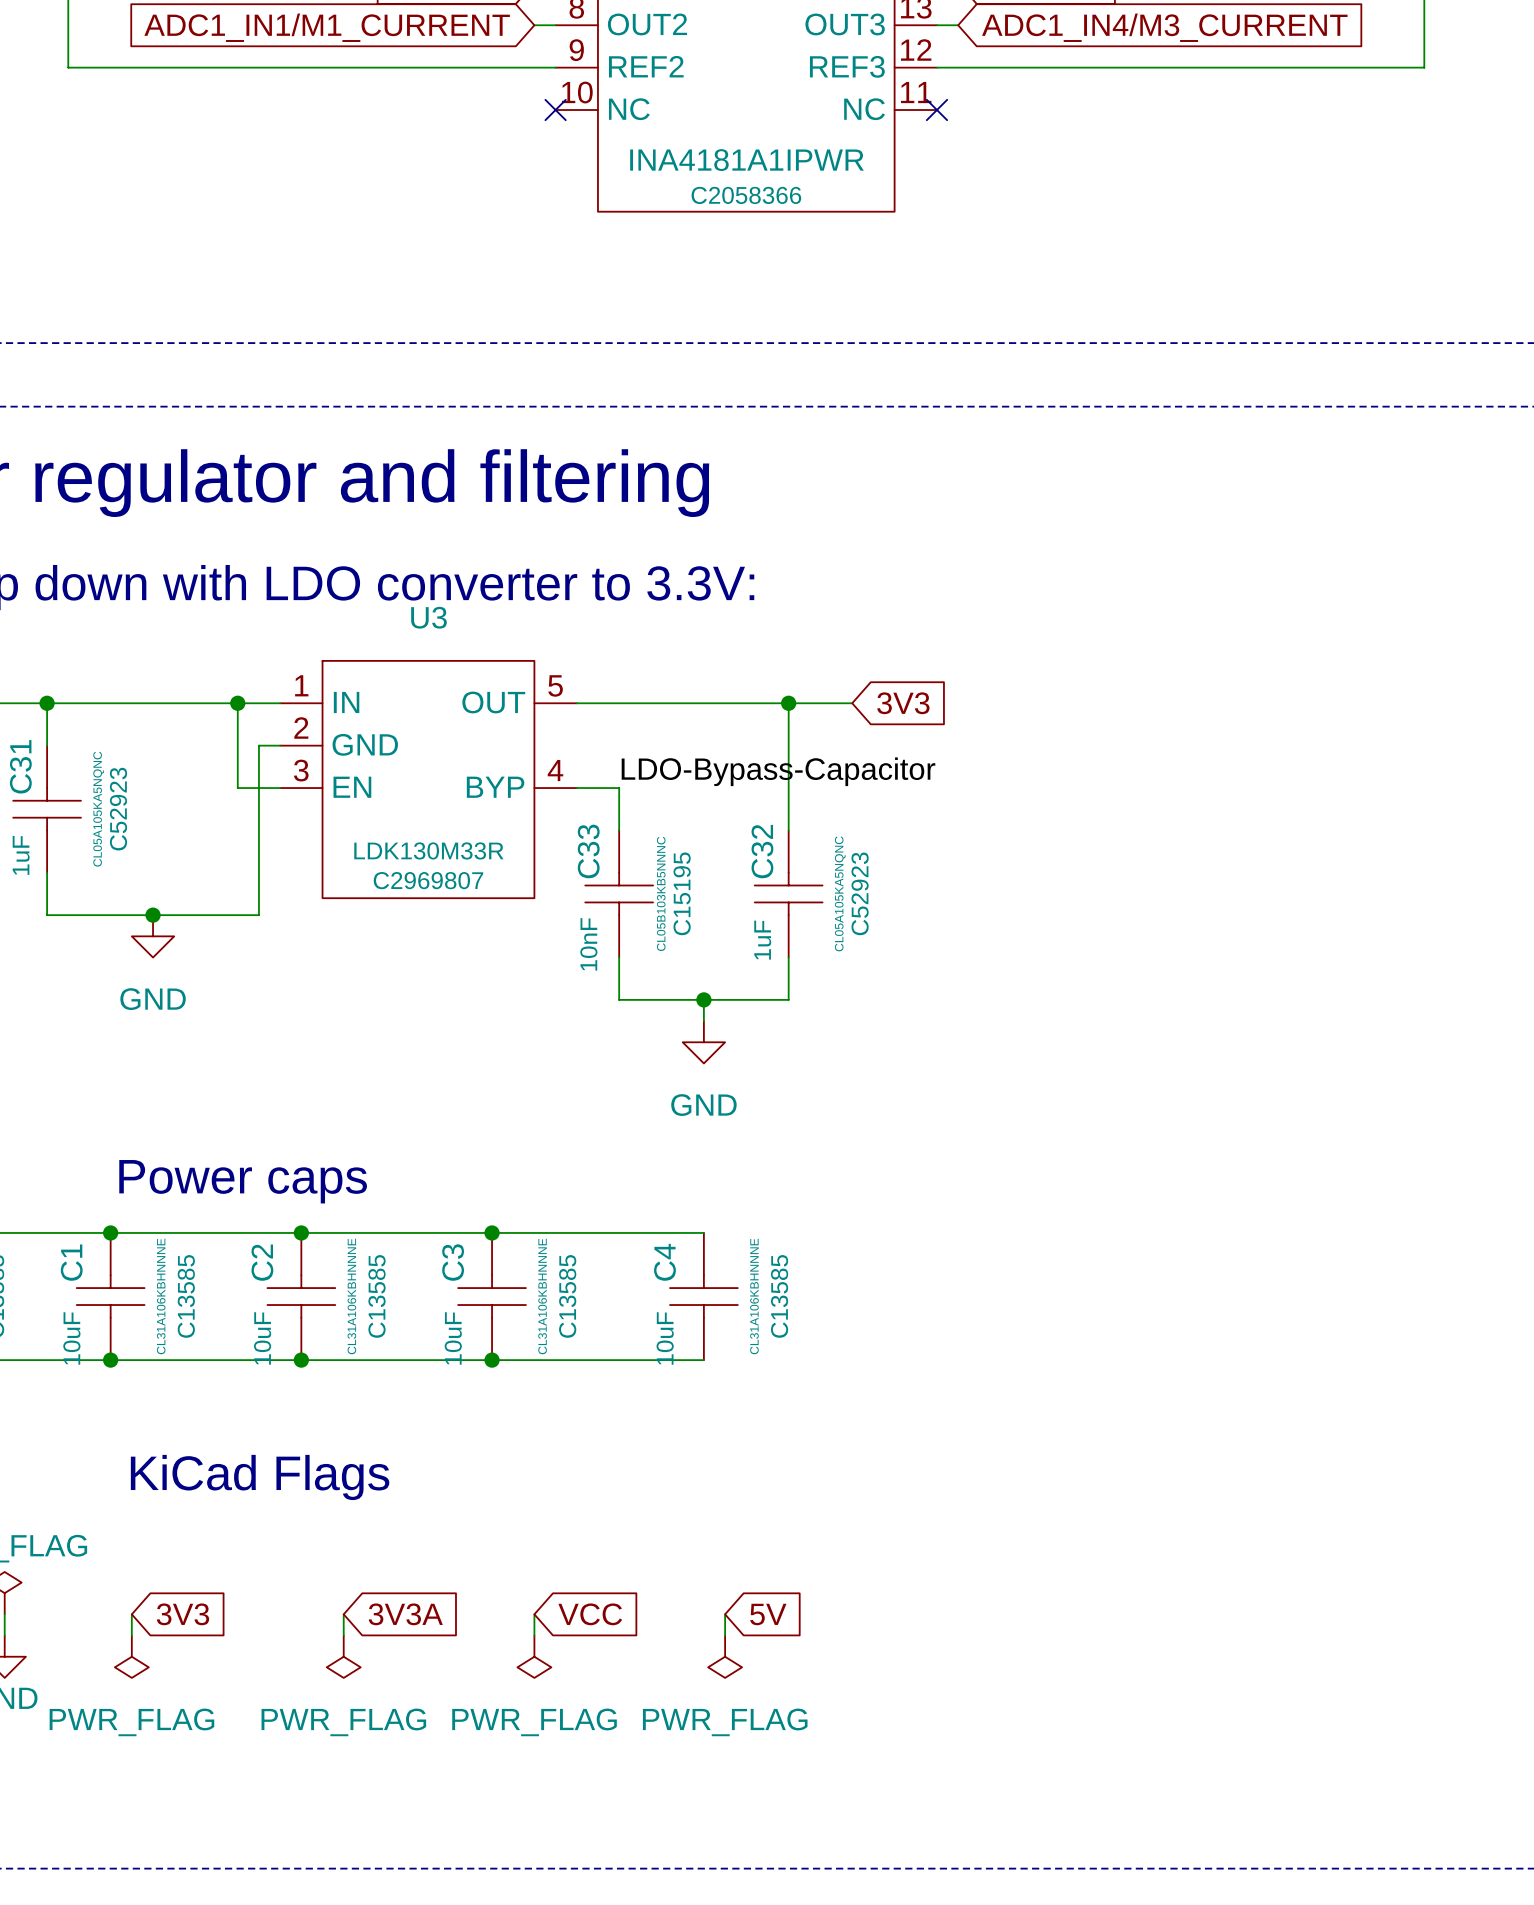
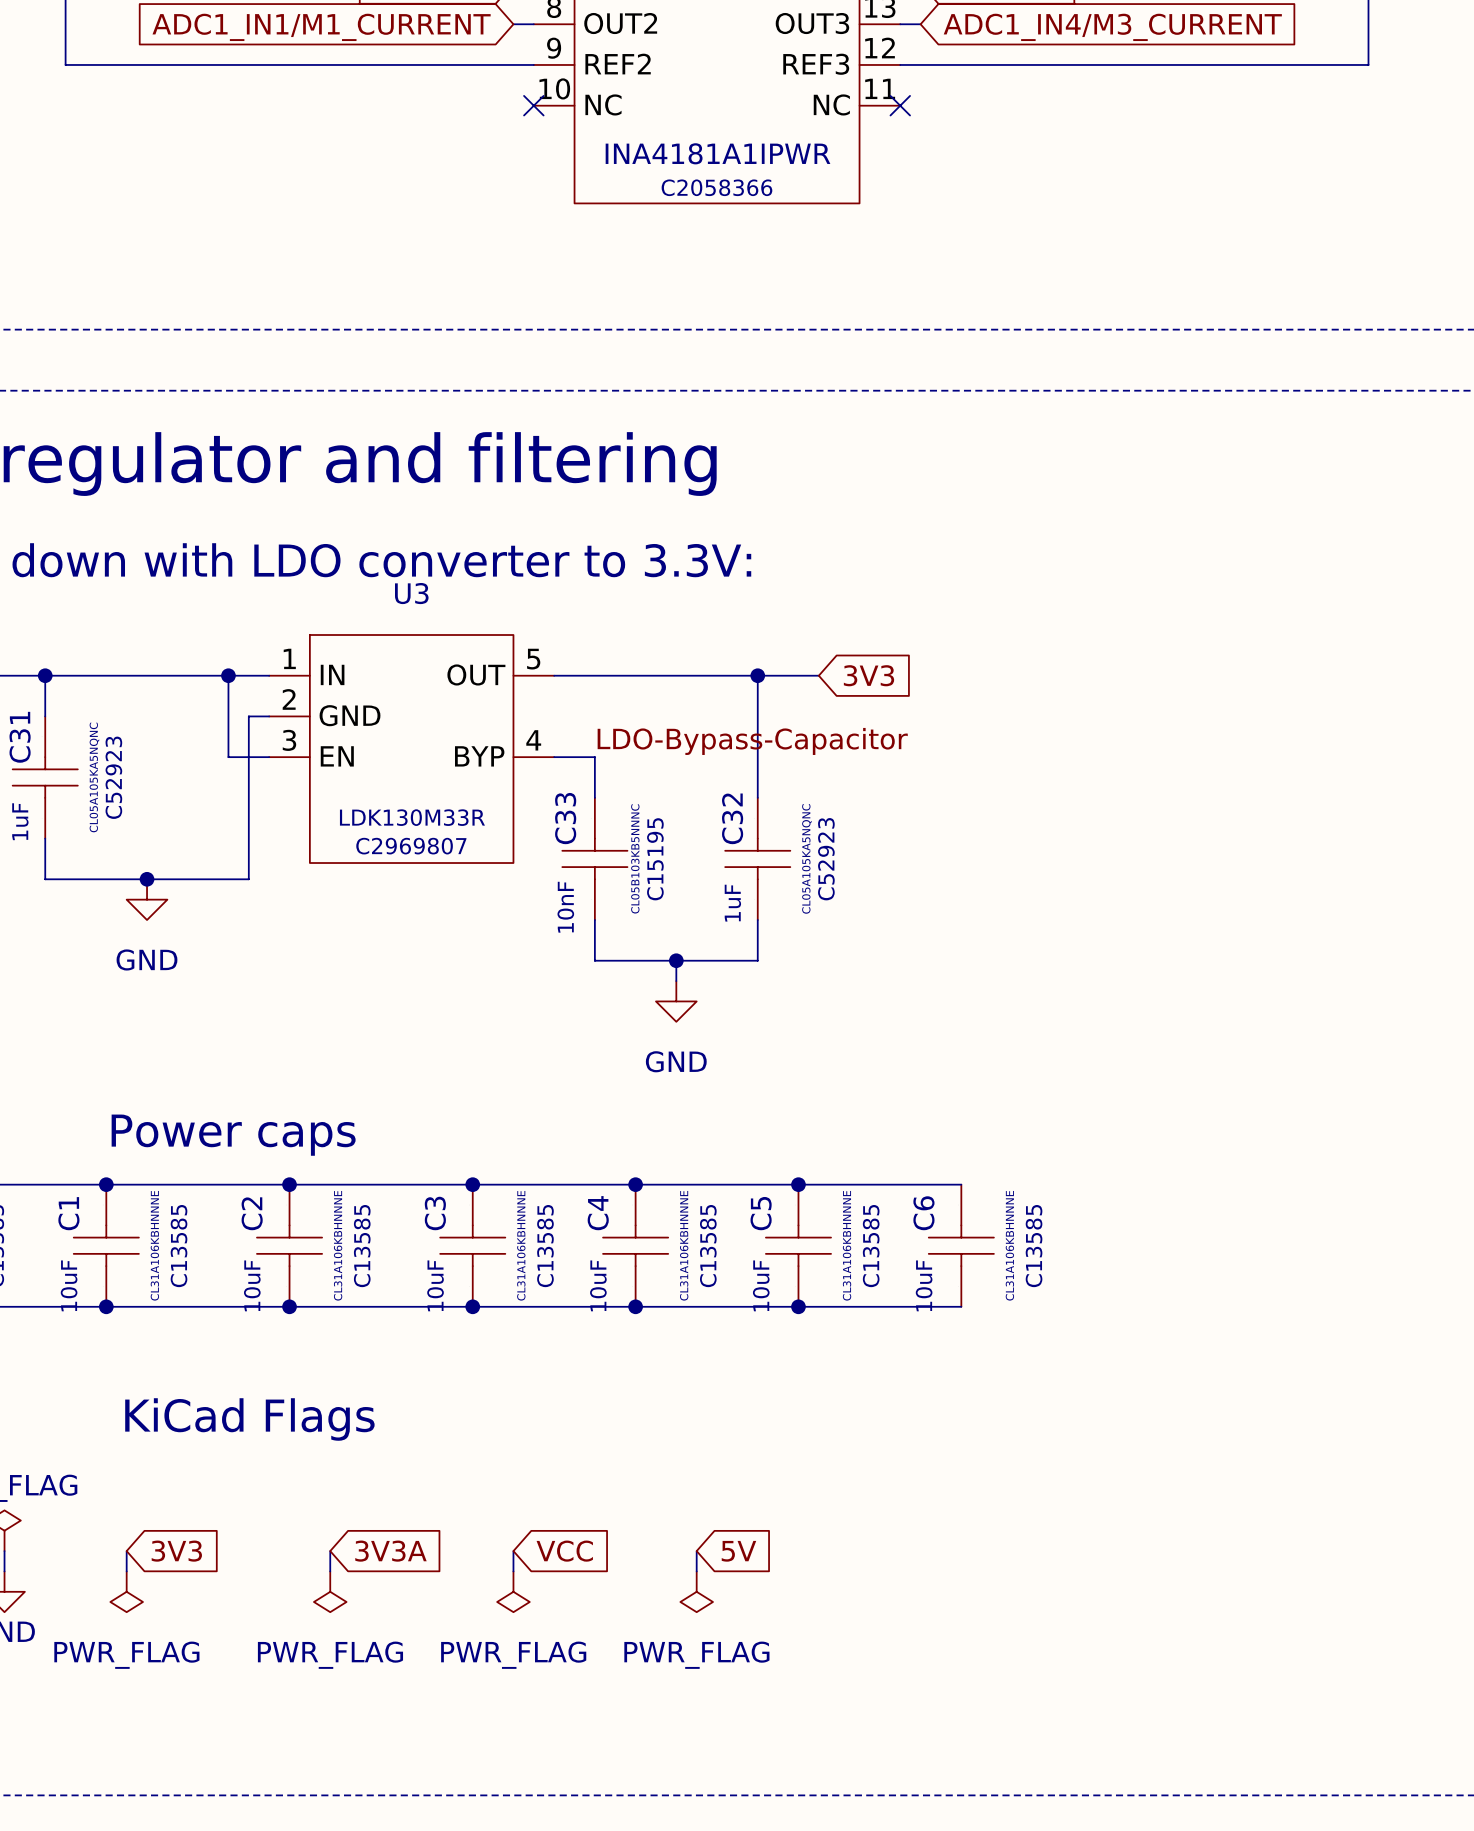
junction: none -> (635, 1184)
wire: none -> (676, 1184) (961, 1184)
junction: none -> (798, 1184)
C4 position: (703, 1296) -> (635, 1245)
C5: none -> 10uF (798, 1245)
C6: none -> 10uF (961, 1245)
junction: none -> (635, 1306)
wire: none -> (676, 1306) (961, 1306)
junction: none -> (798, 1306)

